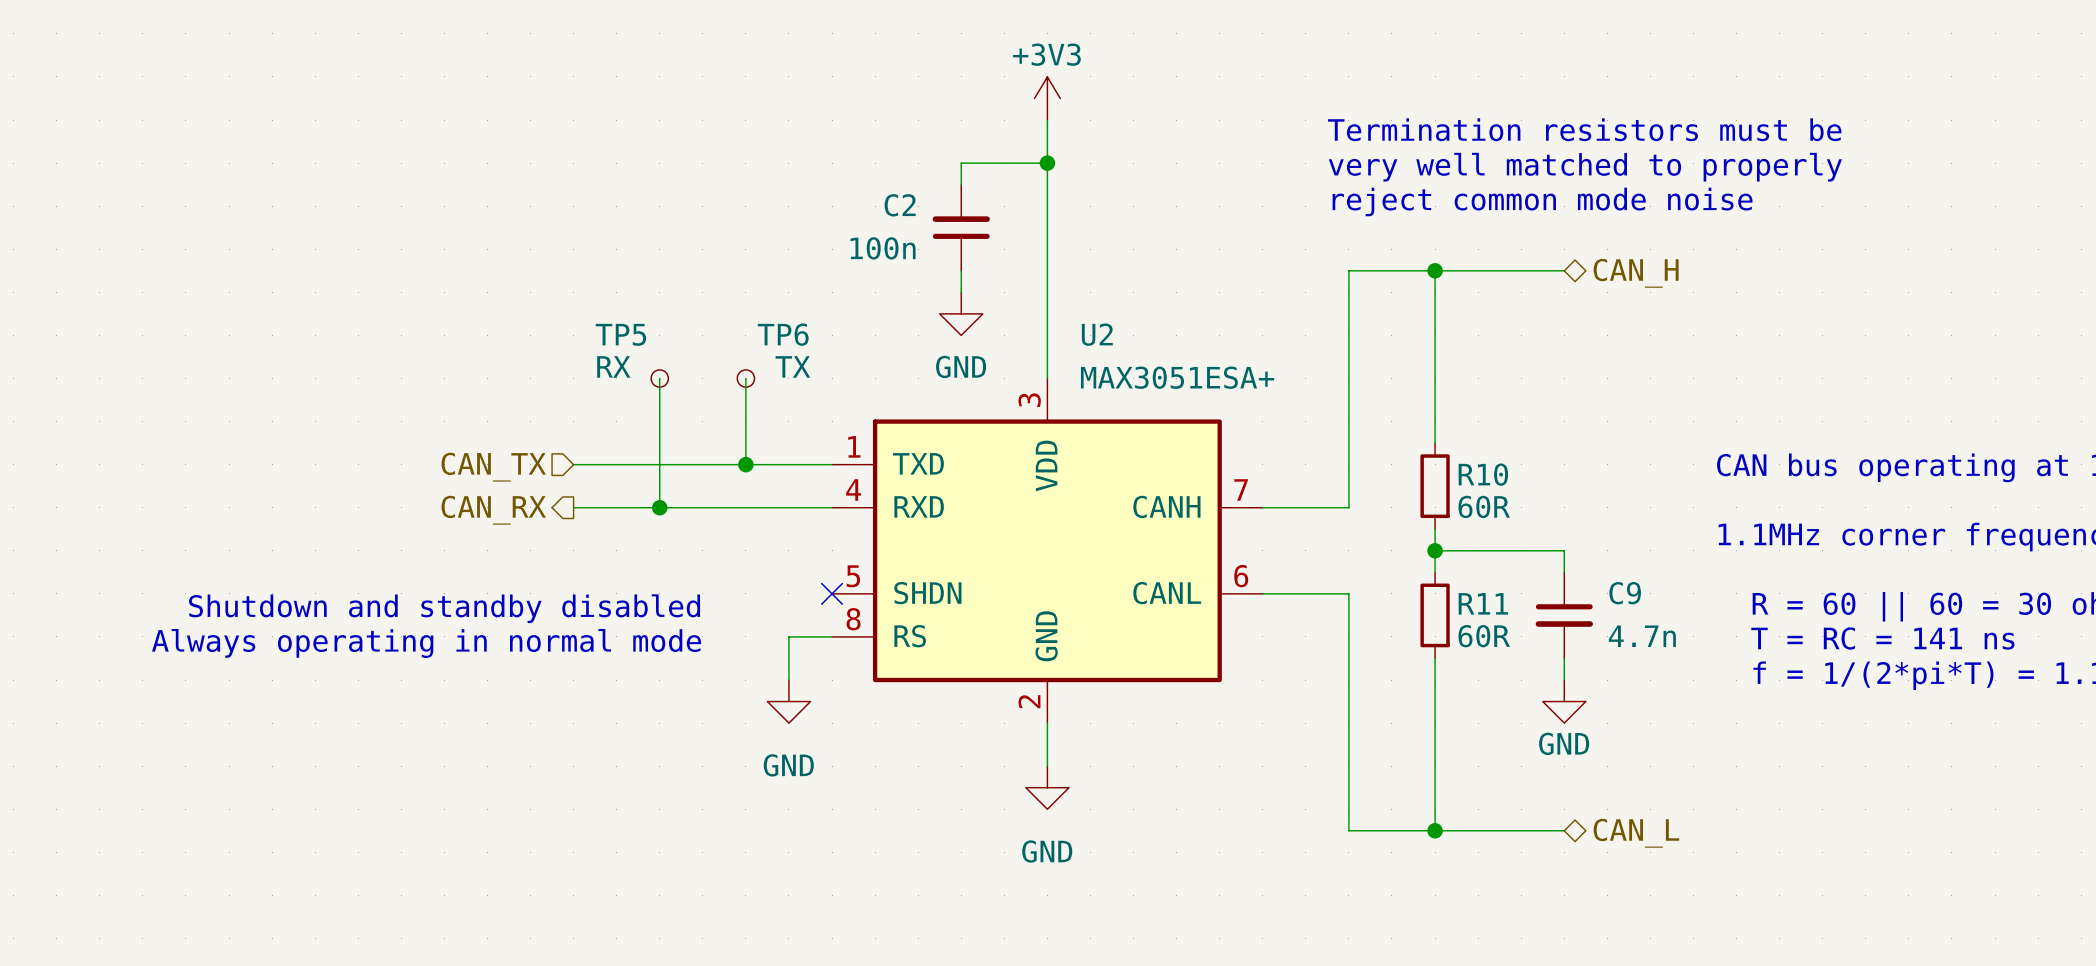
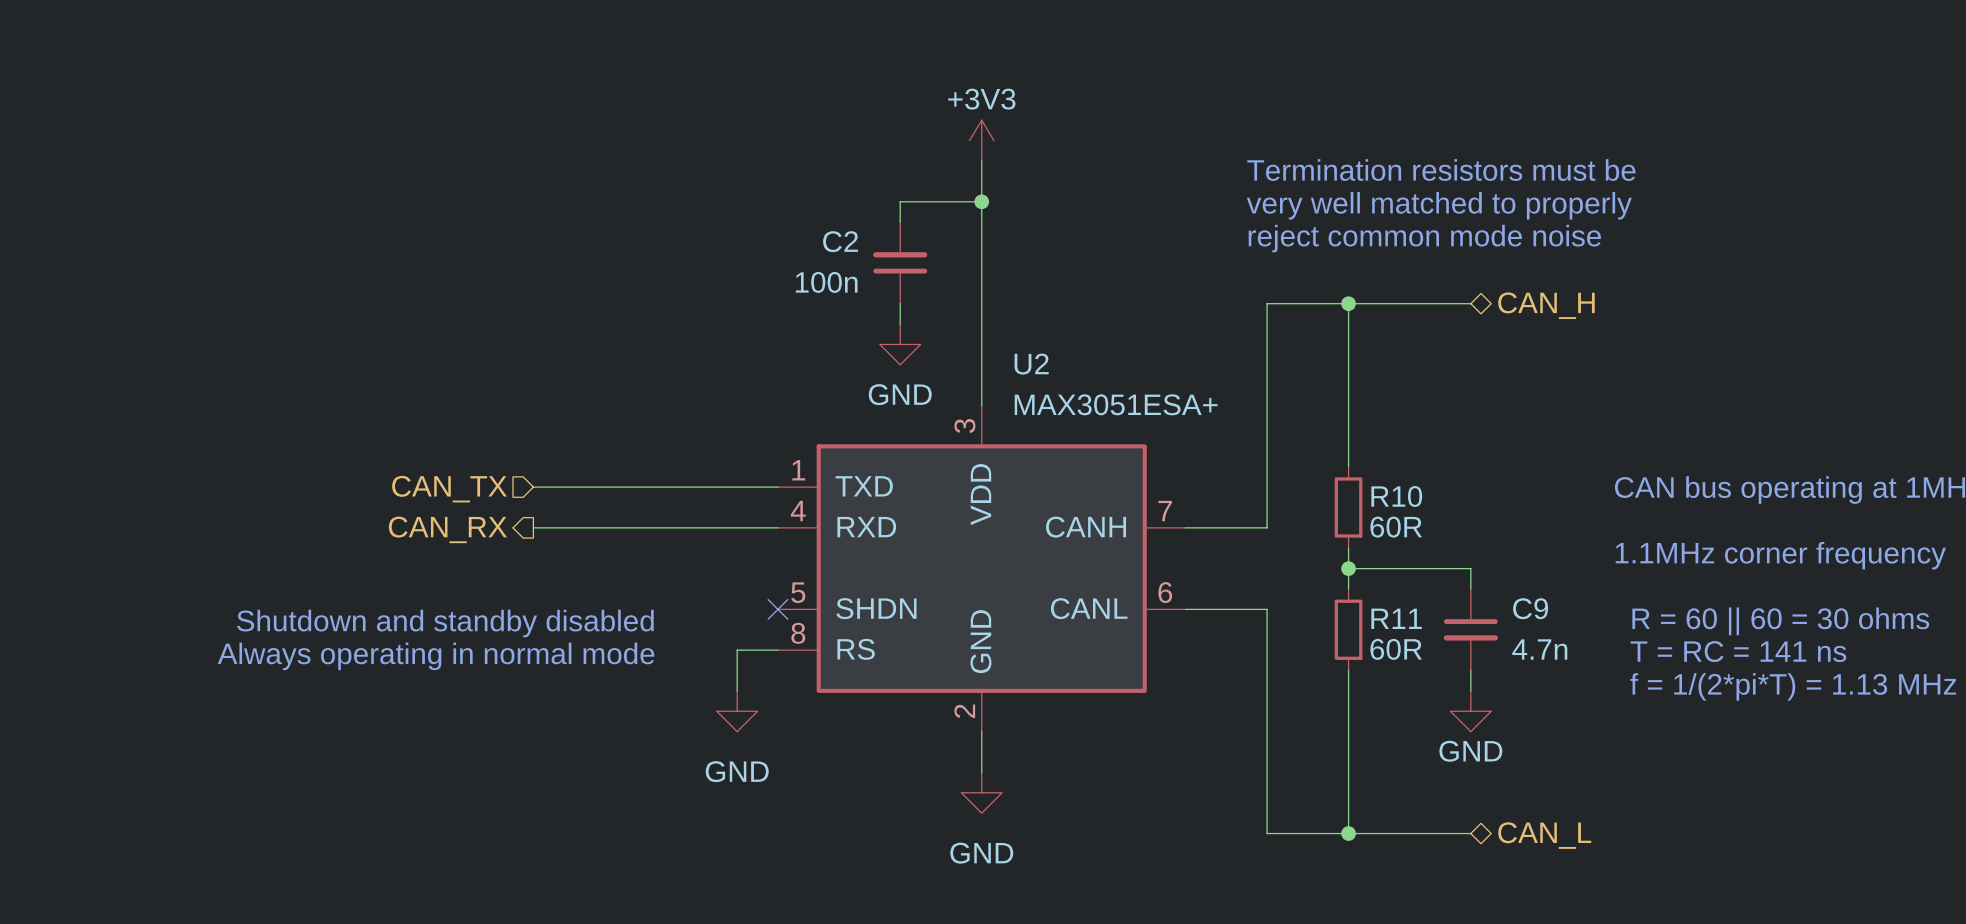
wire: (659, 378) (659, 507) -> none
TP5: RX (659, 378) -> none
wire: (745, 378) (745, 464) -> none
TP6: TX (745, 378) -> none
junction: (745, 464) -> none
junction: (659, 507) -> none

